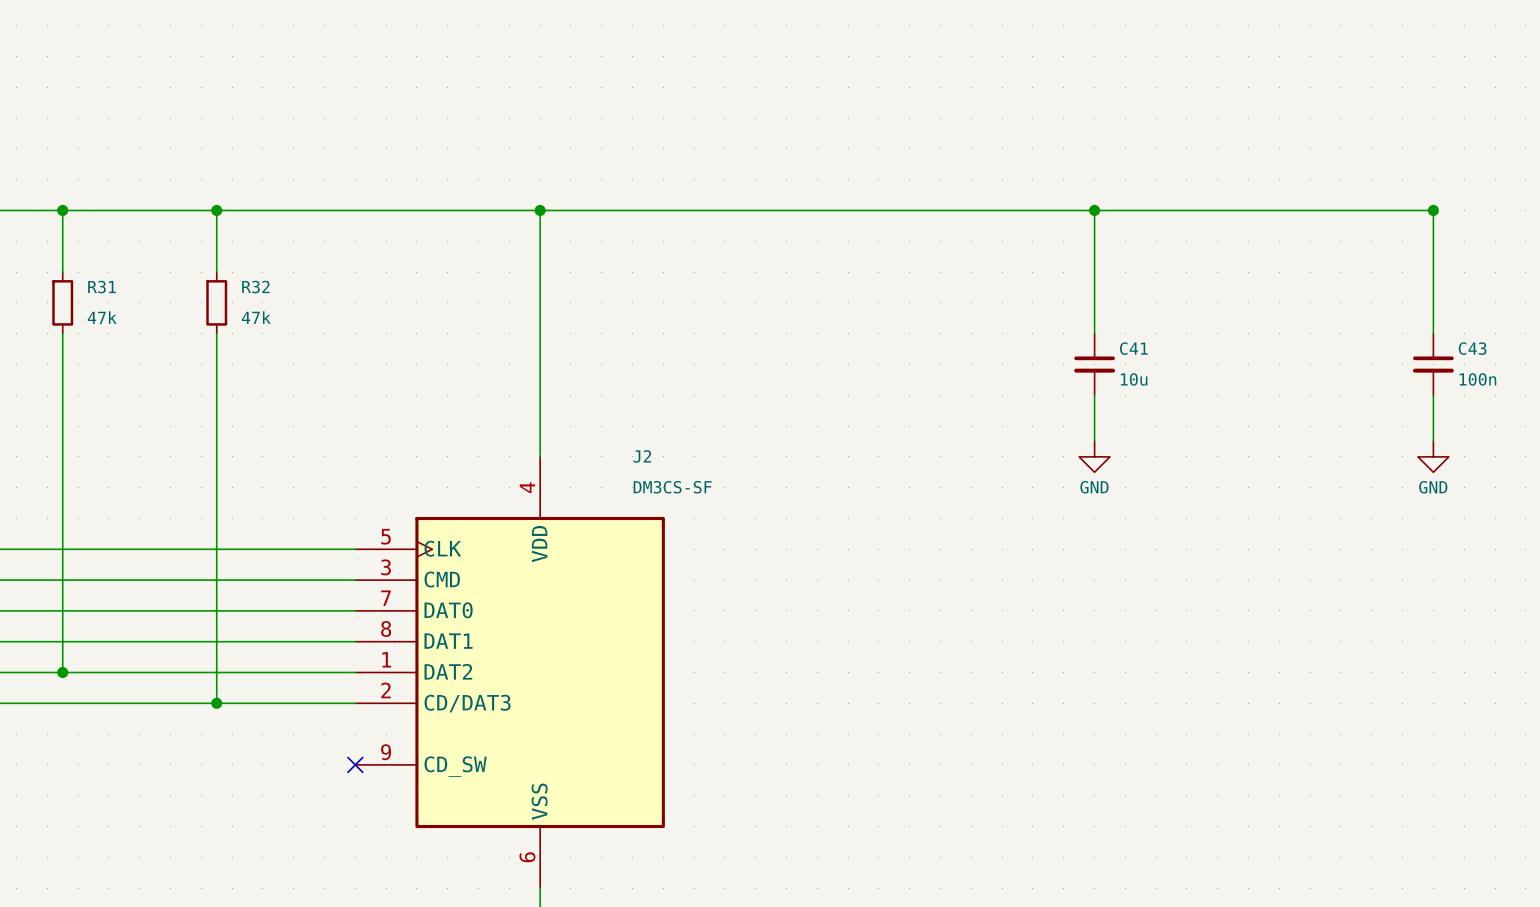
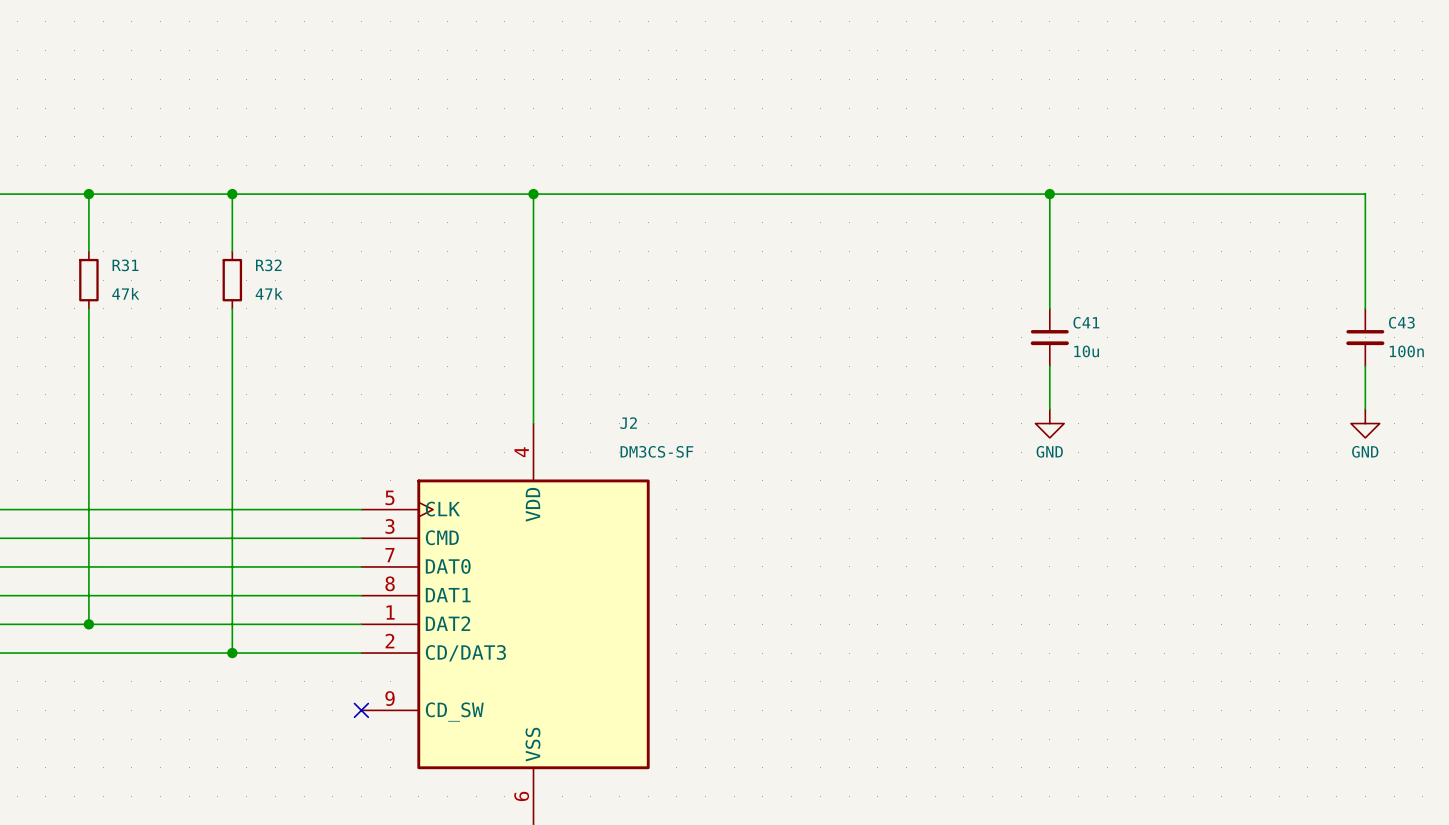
junction: (1433, 210) -> none

